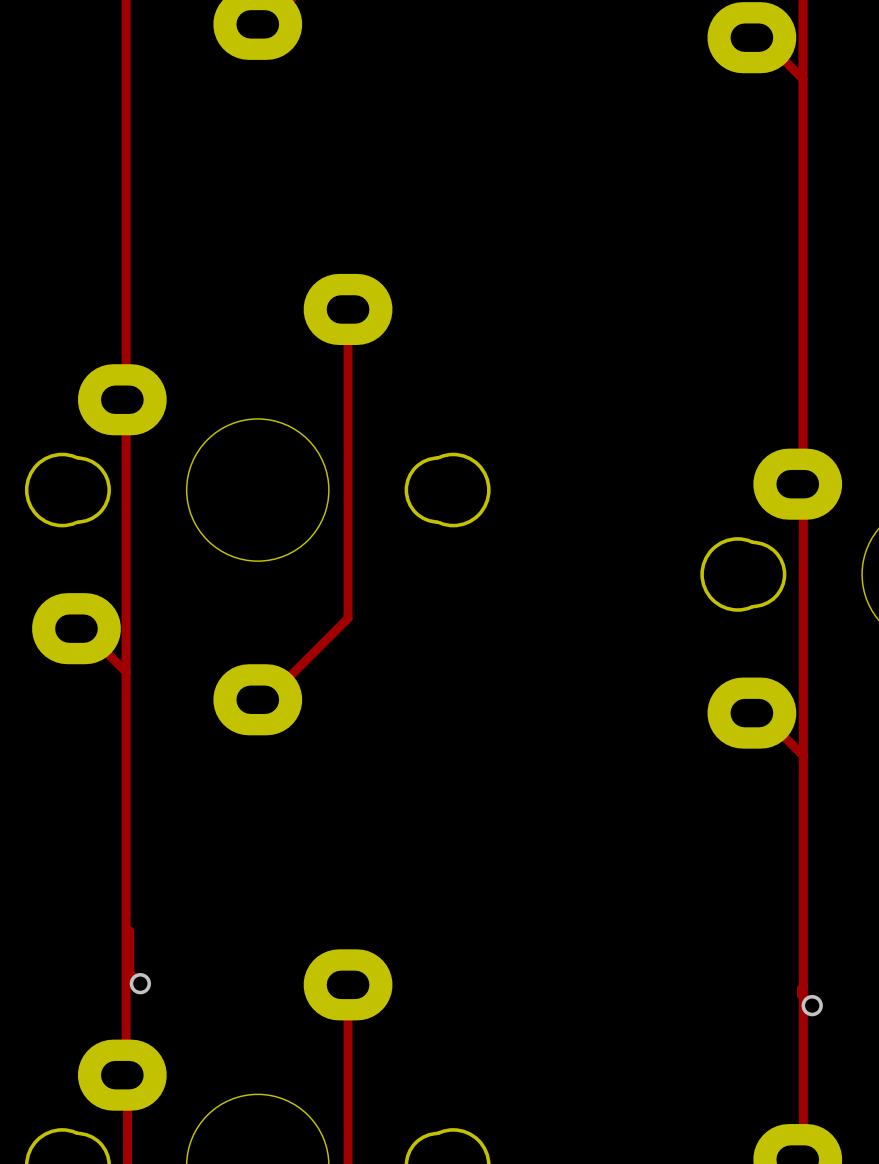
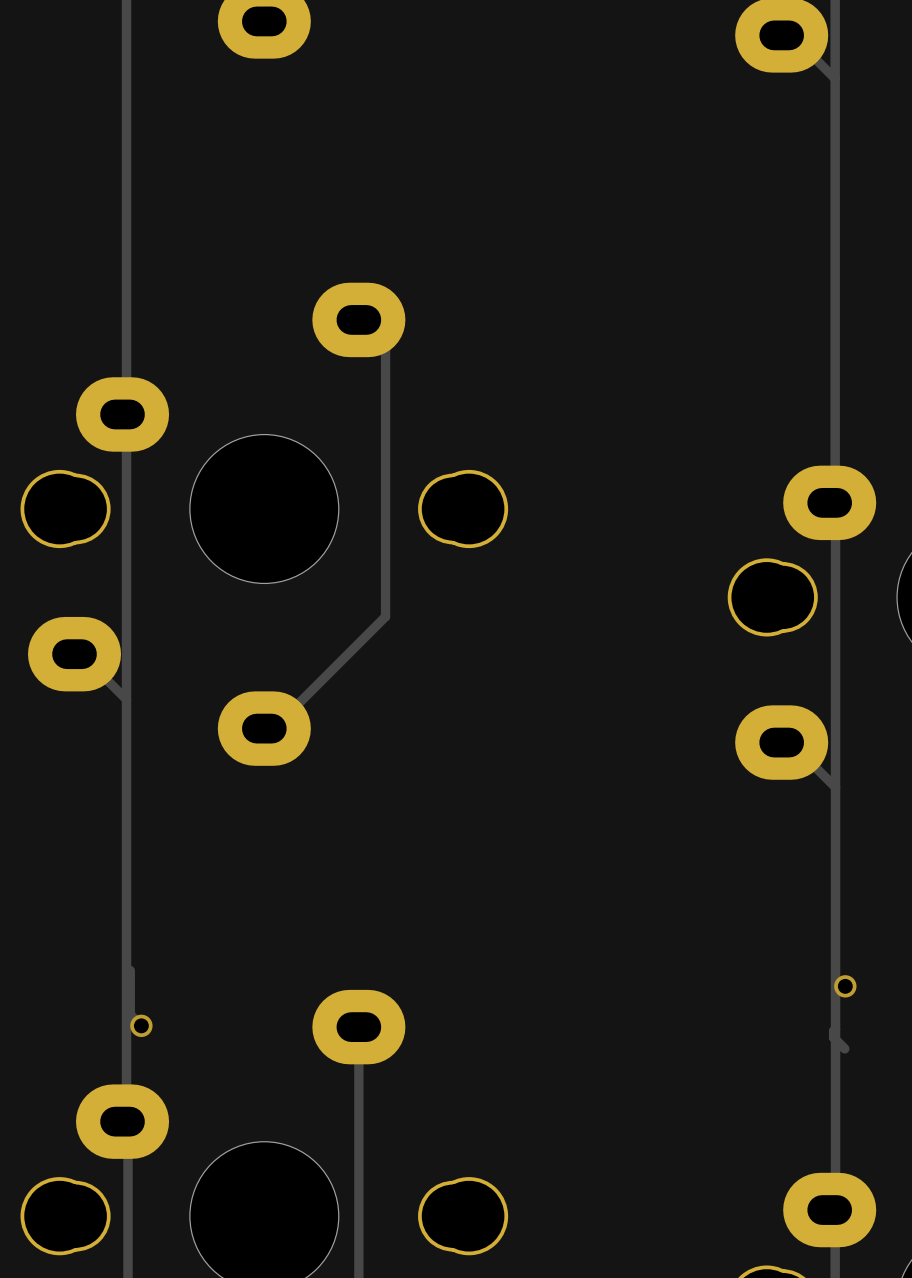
track: (348, 309) (348, 618) -> (358, 319) (385, 346) (385, 616) (358, 643)
via position: (812, 1005) -> (845, 986)

